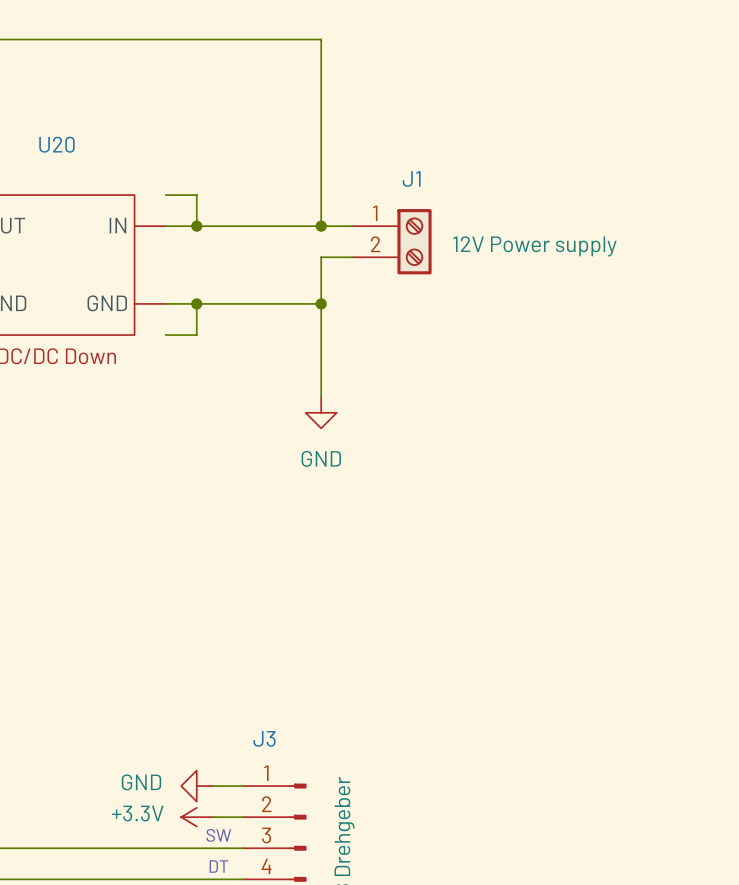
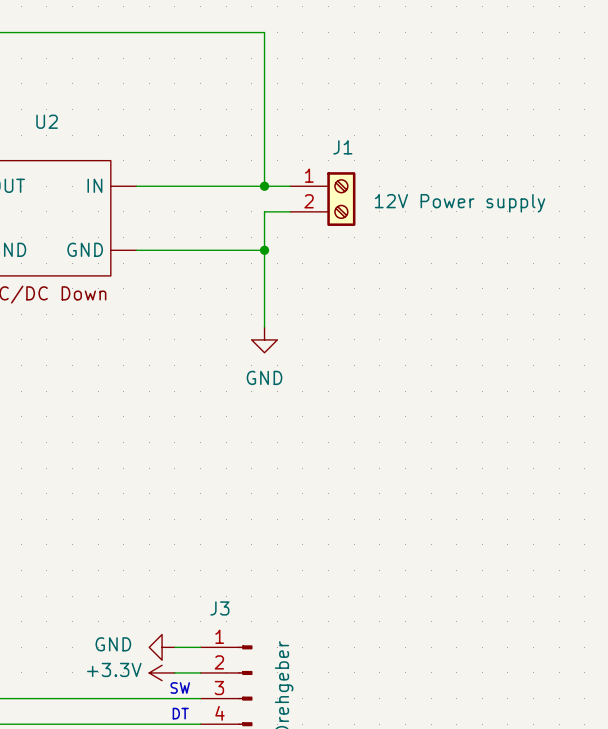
U20 name: U20 (56, 144) -> U2 (47, 121)
wire: (165, 195) (196, 195) (196, 226) -> none
junction: (196, 226) -> none
wire: (196, 303) (196, 335) (165, 335) -> none
junction: (196, 303) -> none

